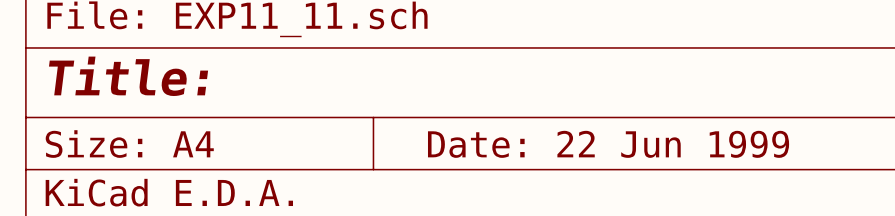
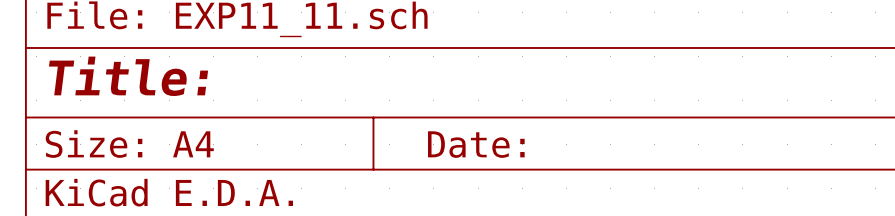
title block: Date: 22 Jun 1999 (608, 144) -> Date: (476, 144)

